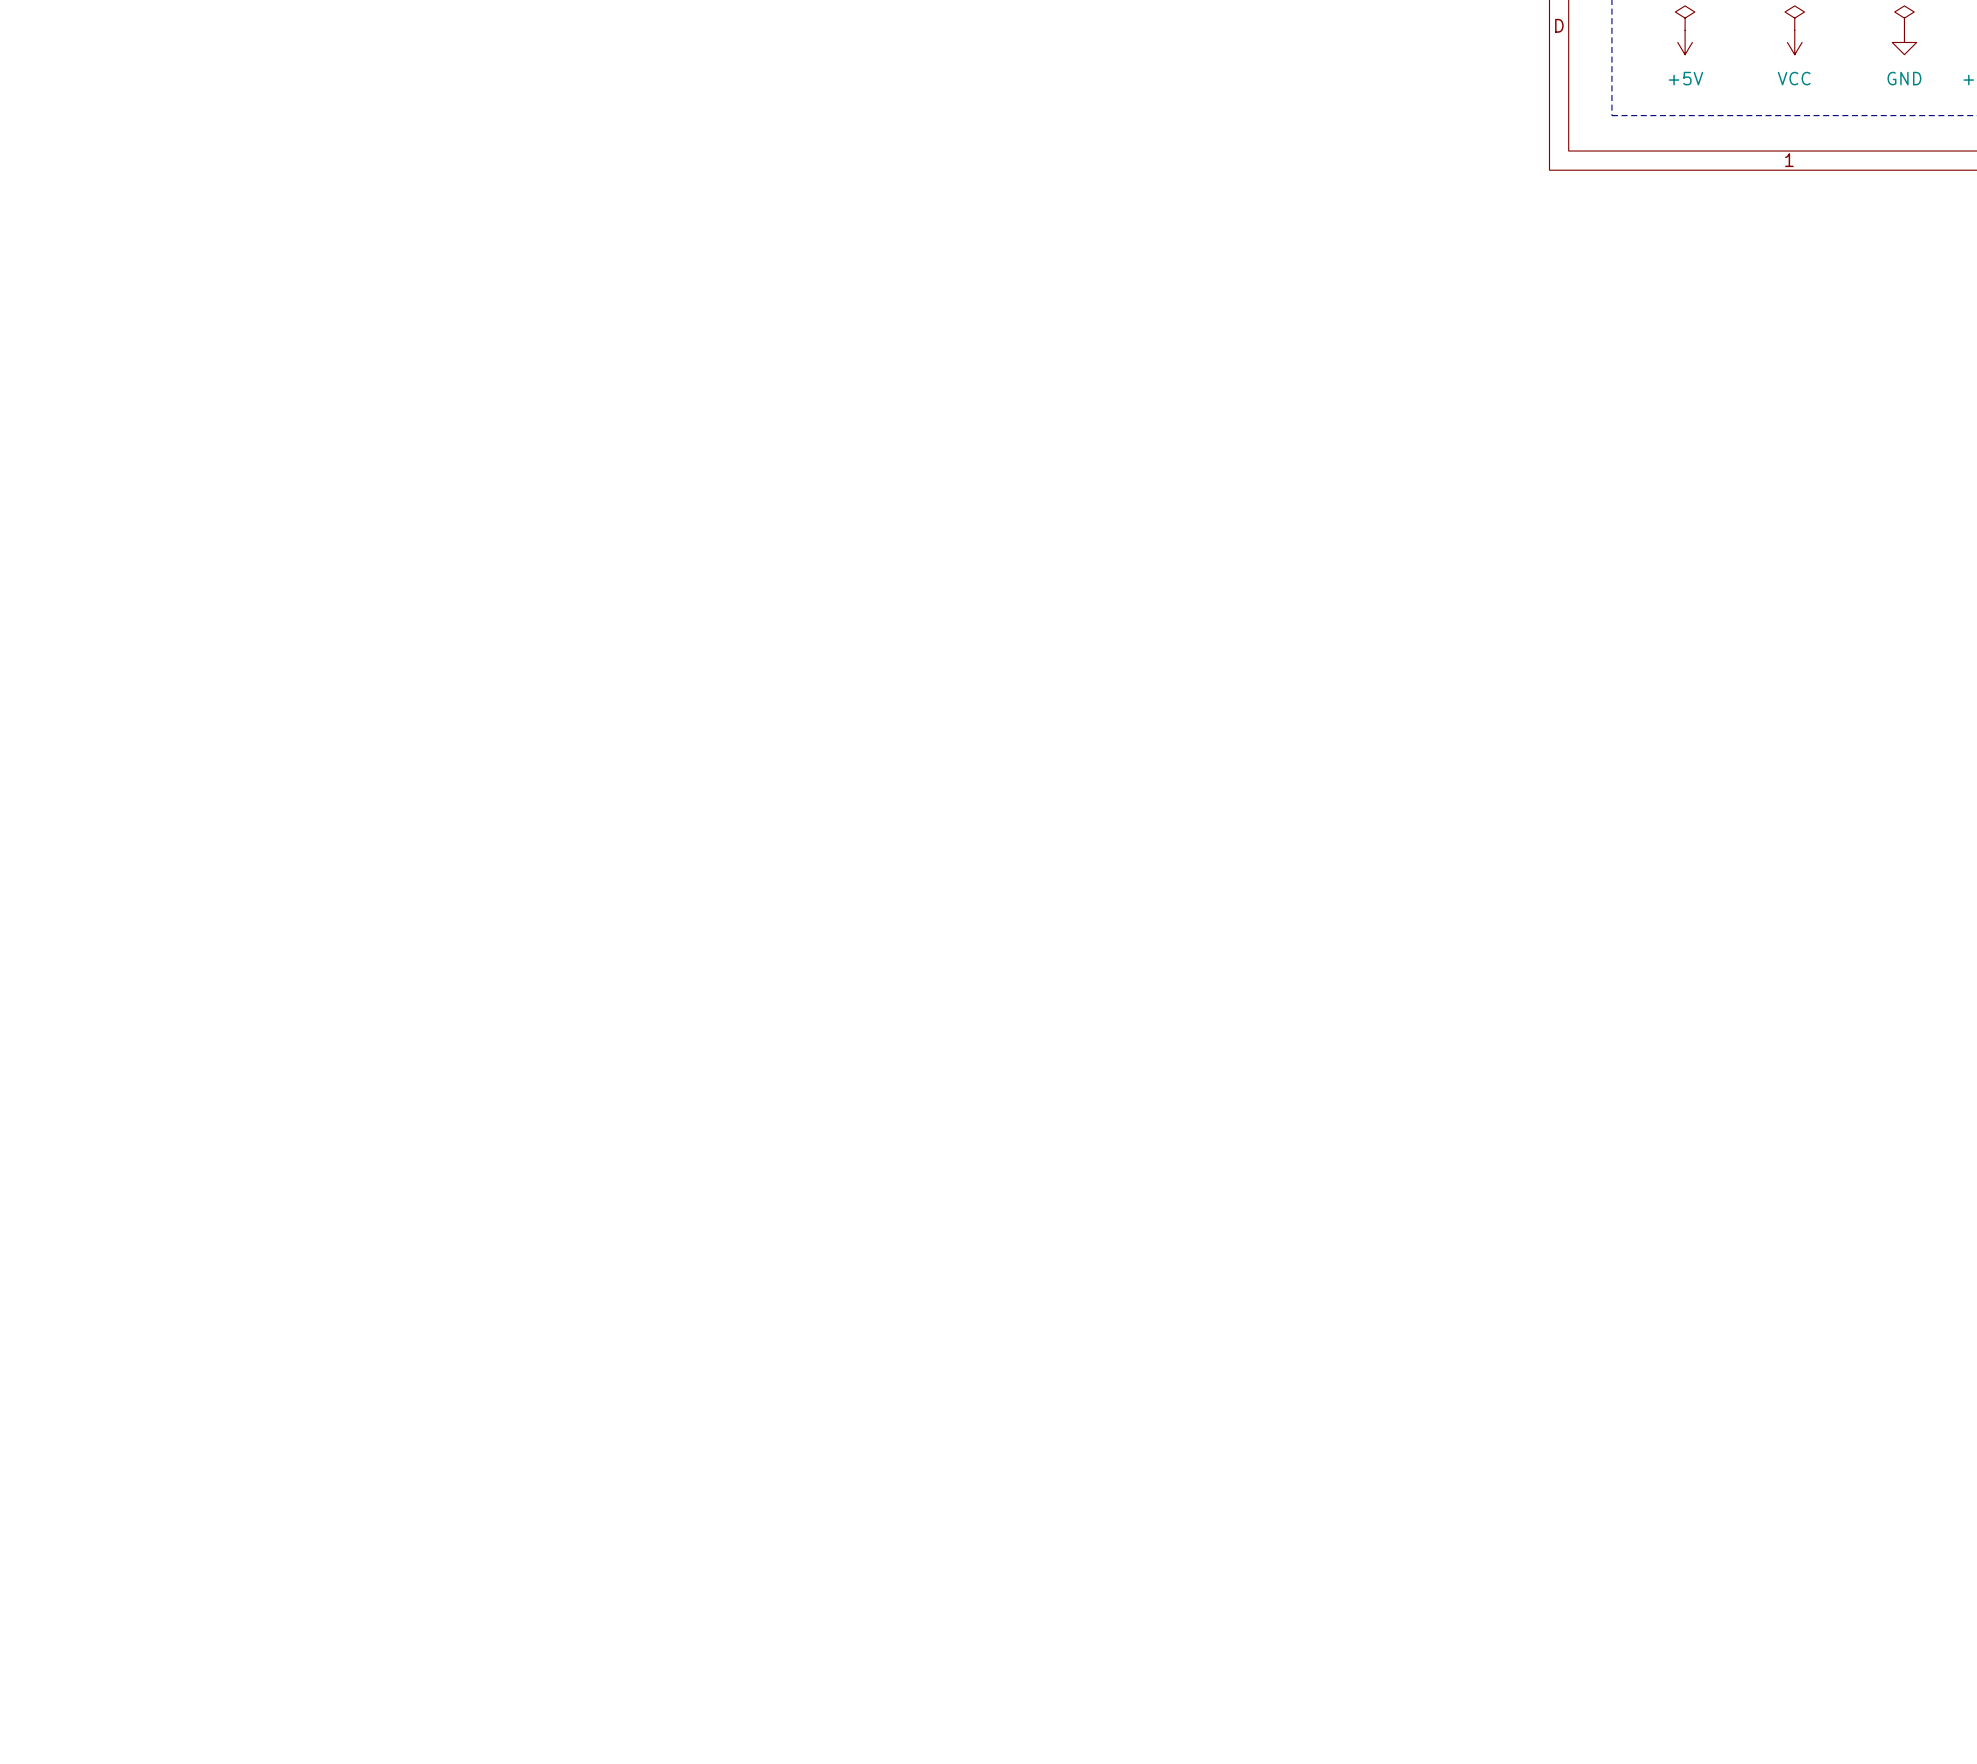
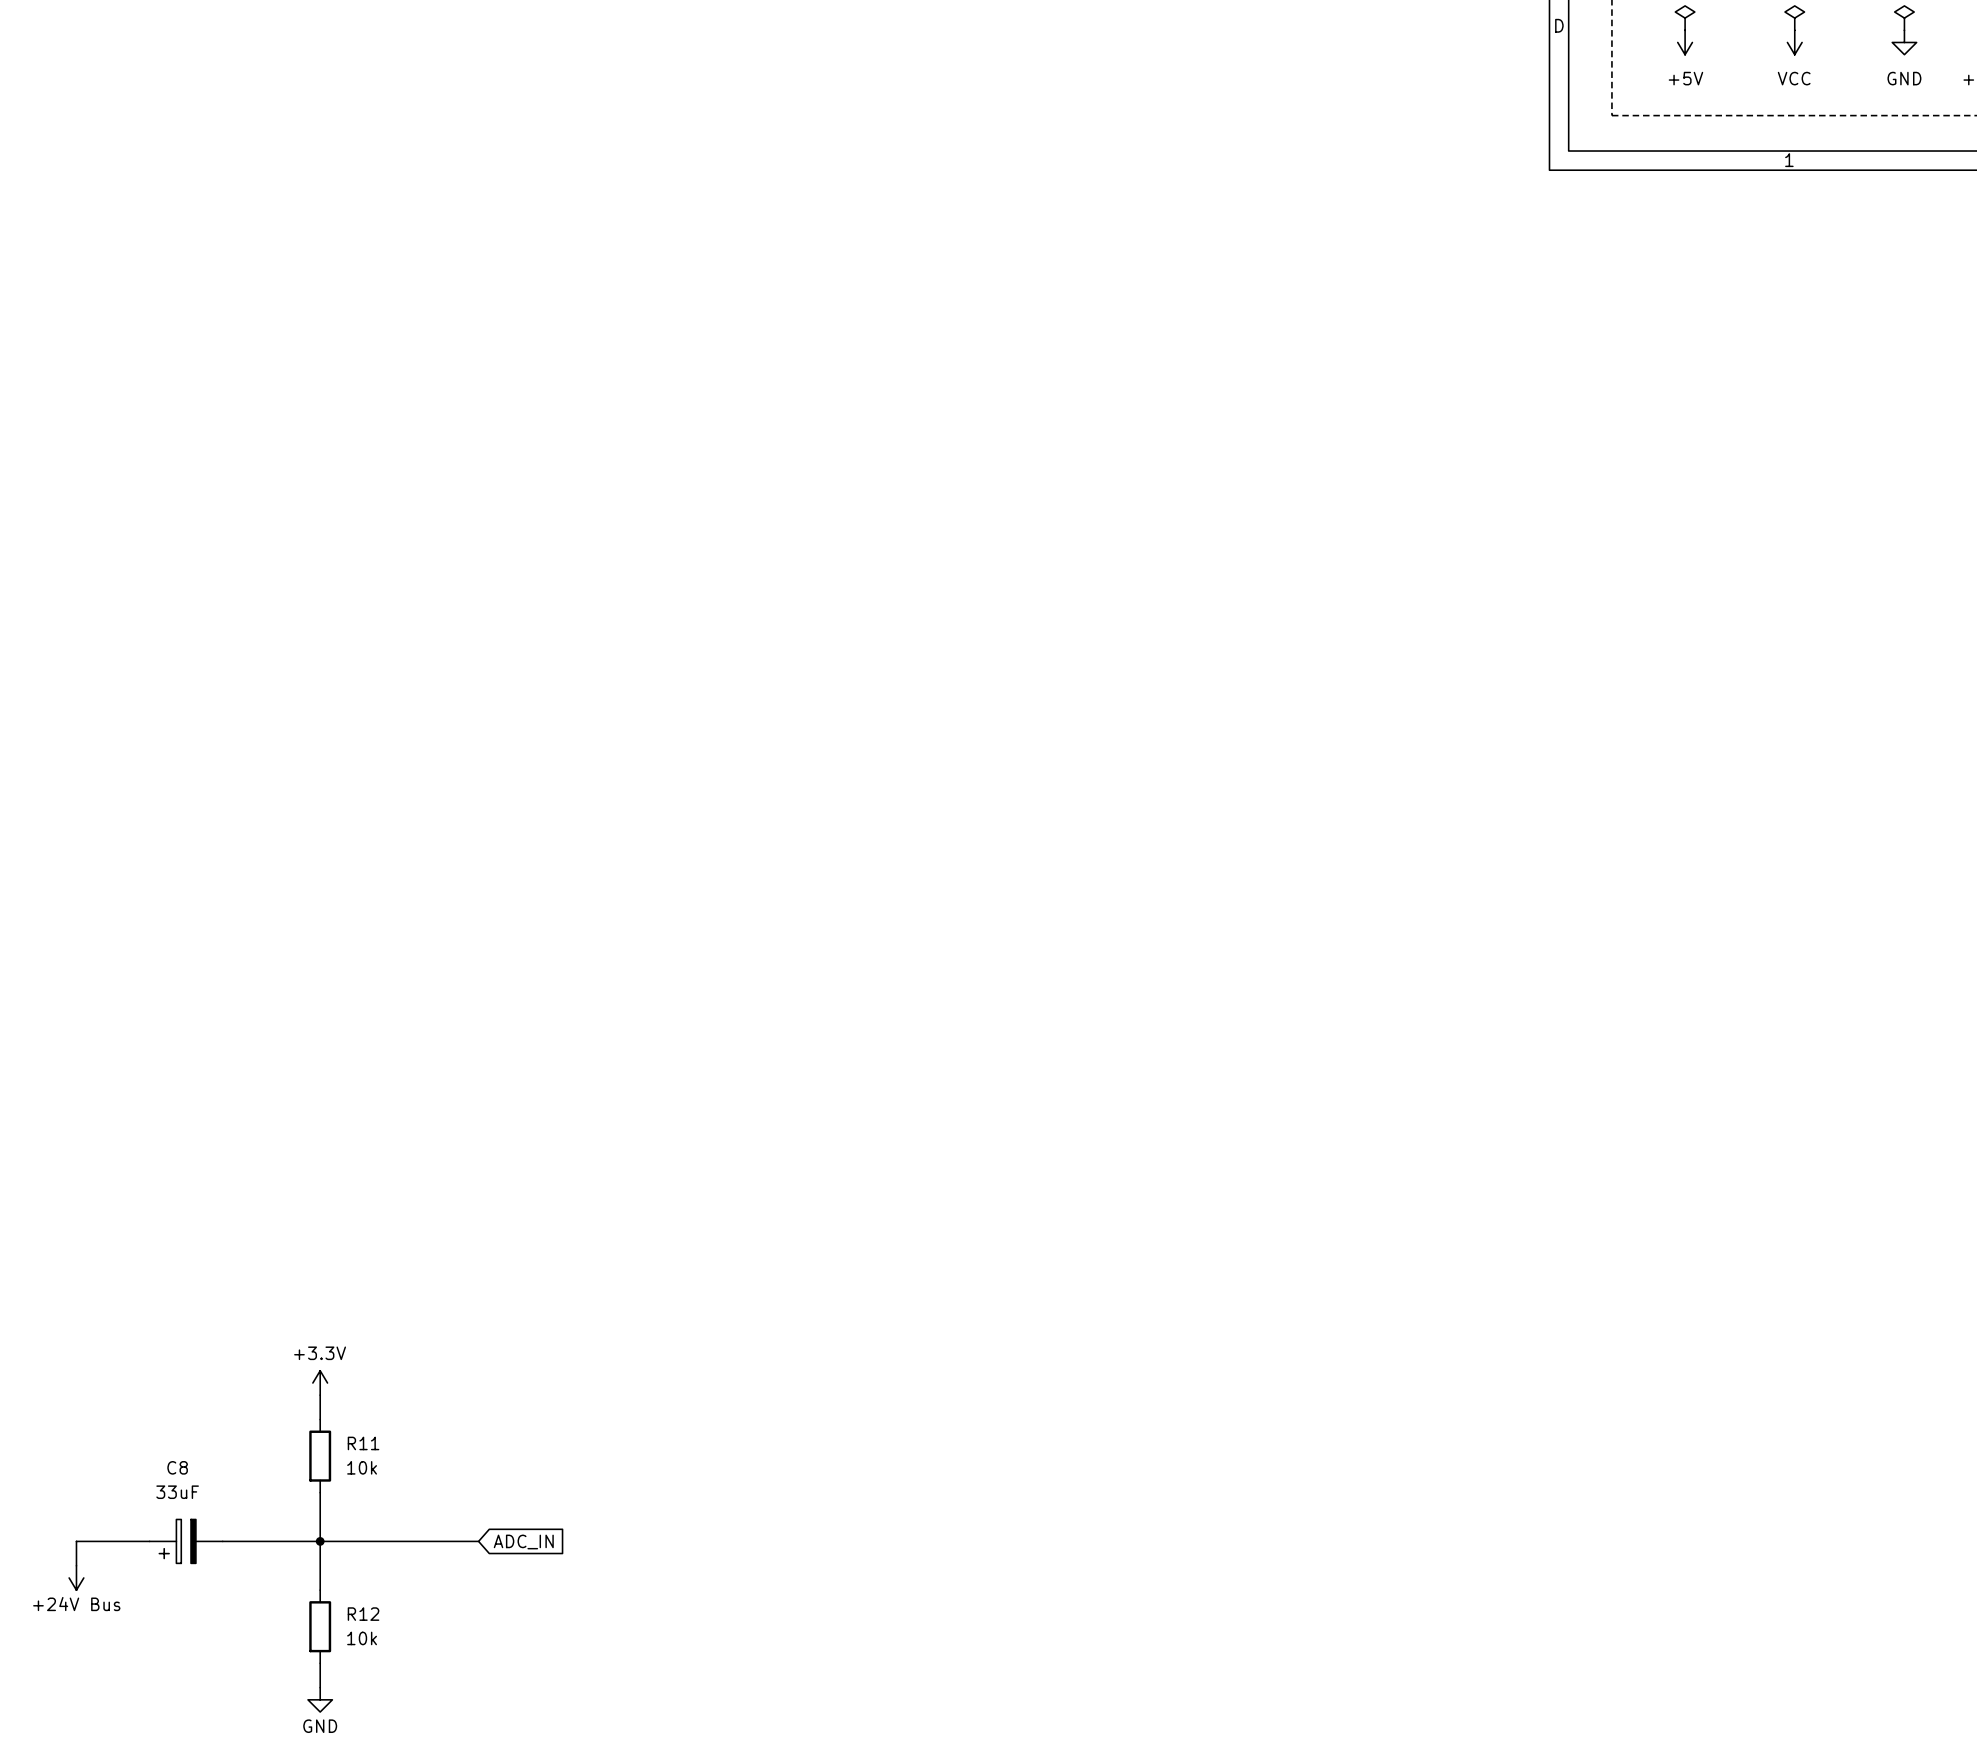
power symbol: none -> +3.3V (320, 1382)
wire: none -> (320, 1395) (320, 1419)
R11: none -> 10k (320, 1456)
wire: none -> (320, 1492) (320, 1590)
wire: none -> (149, 1541) (76, 1541) (76, 1565)
C8: none -> 33uF (186, 1541)
wire: none -> (222, 1541) (478, 1541)
junction: none -> (320, 1541)
global label: none -> ADC_IN (523, 1541)
power symbol: none -> +24V Bus (76, 1577)
R12: none -> 10k (320, 1626)
wire: none -> (320, 1663) (320, 1687)
power symbol: none -> GND (320, 1699)

